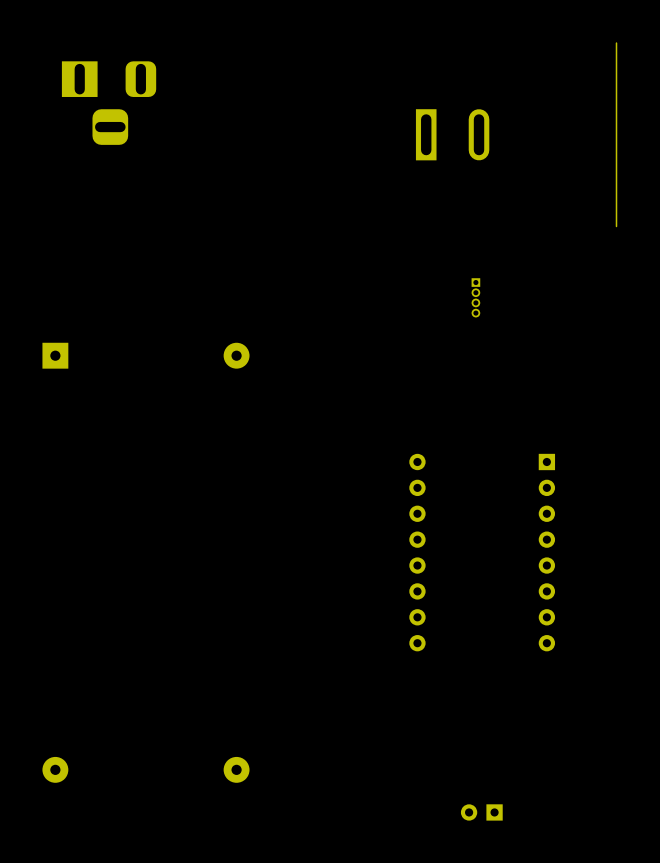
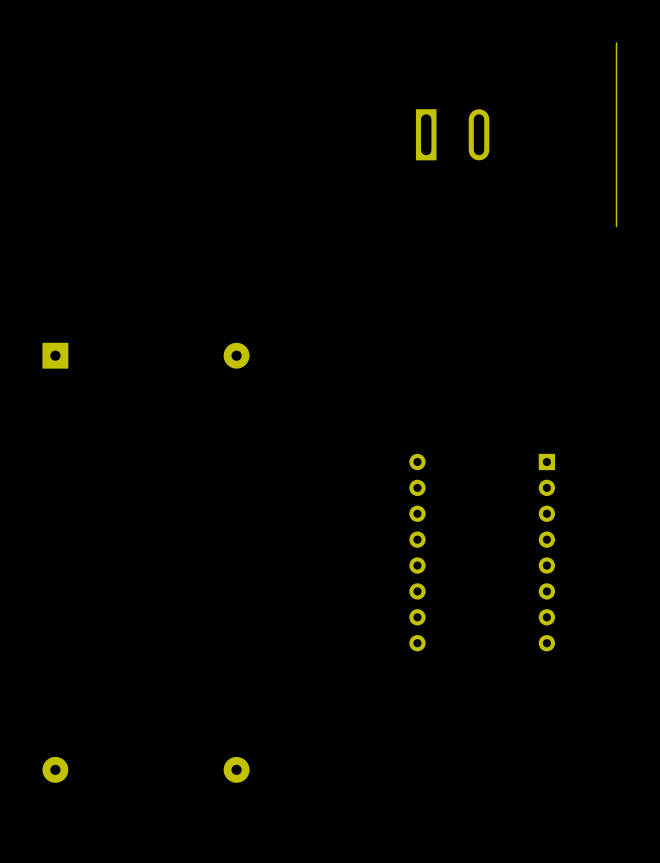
part: (109, 103) -> none
part: (475, 297) -> none
part: (481, 812) -> none

